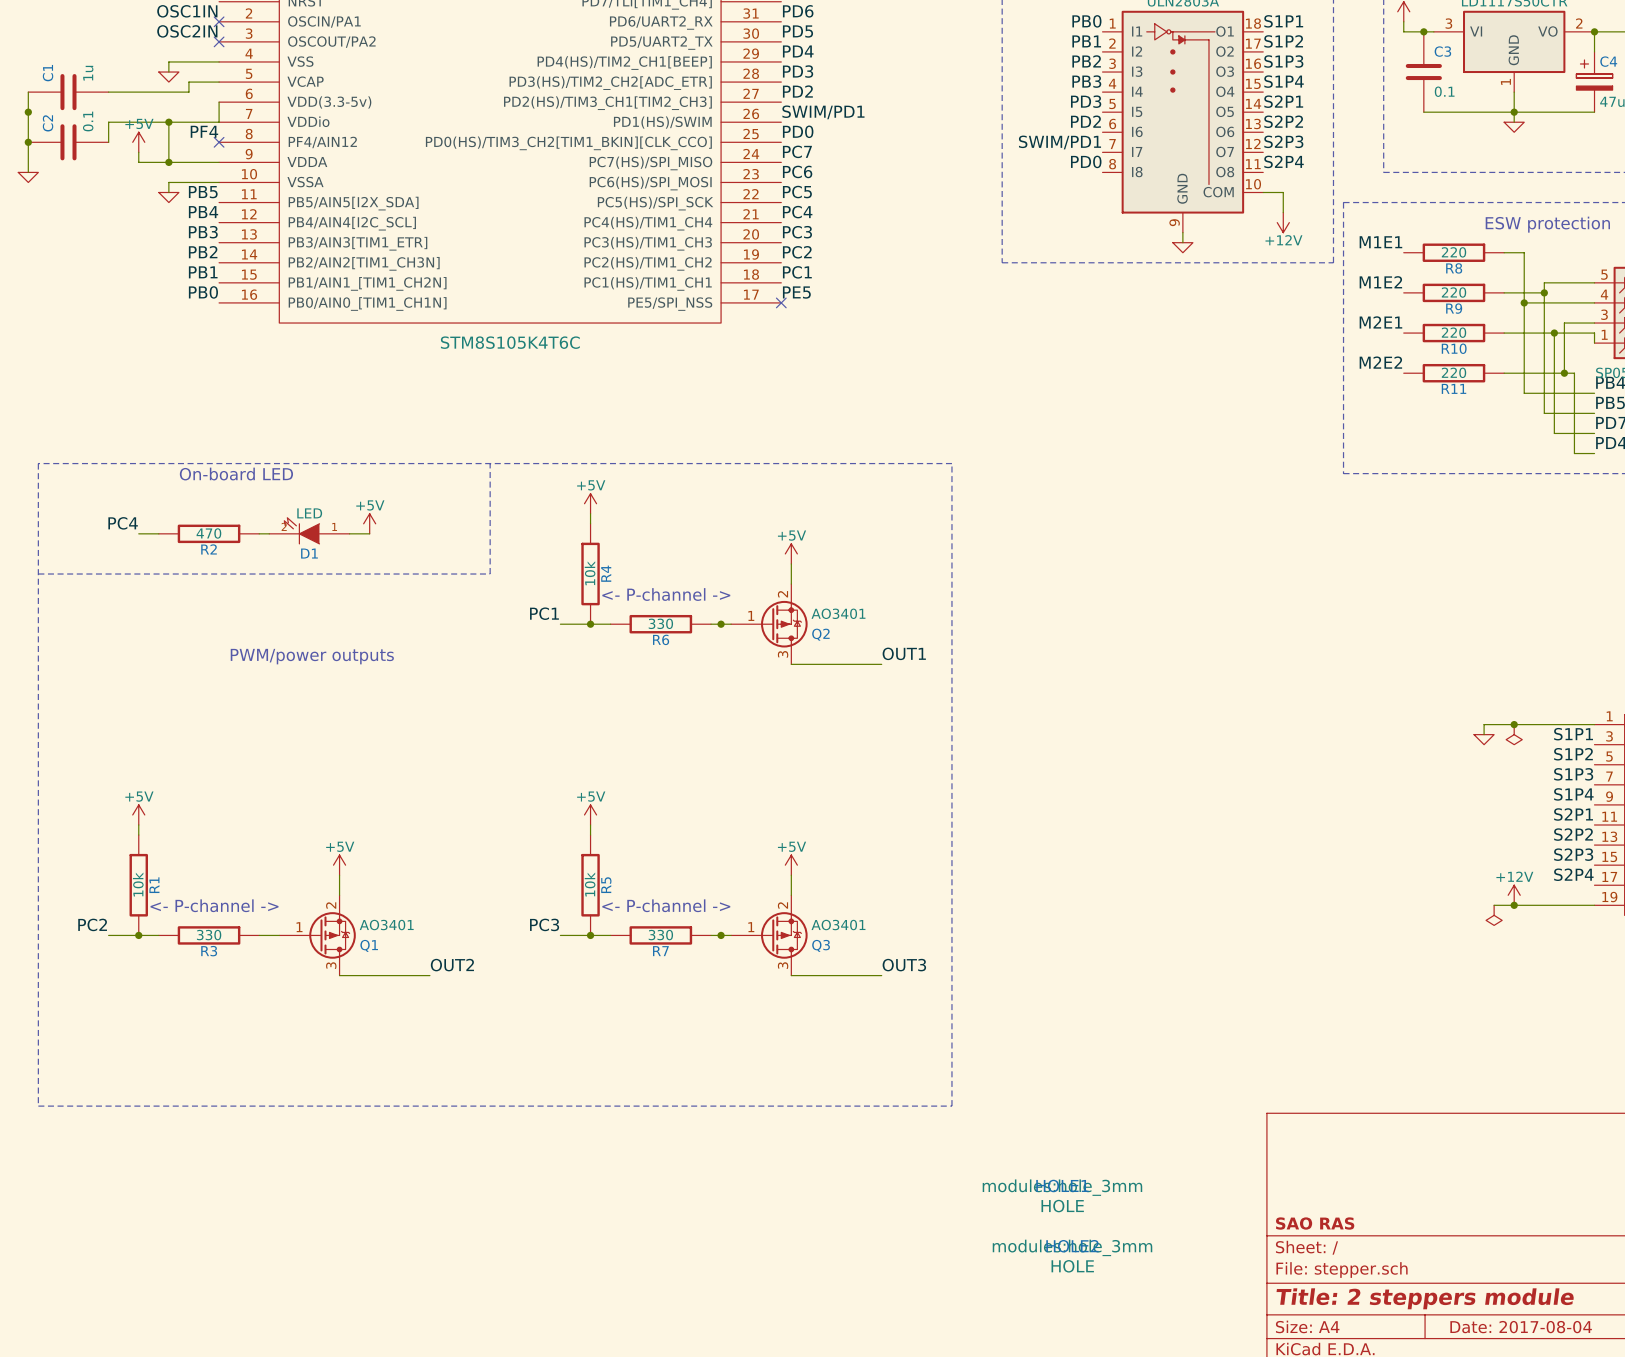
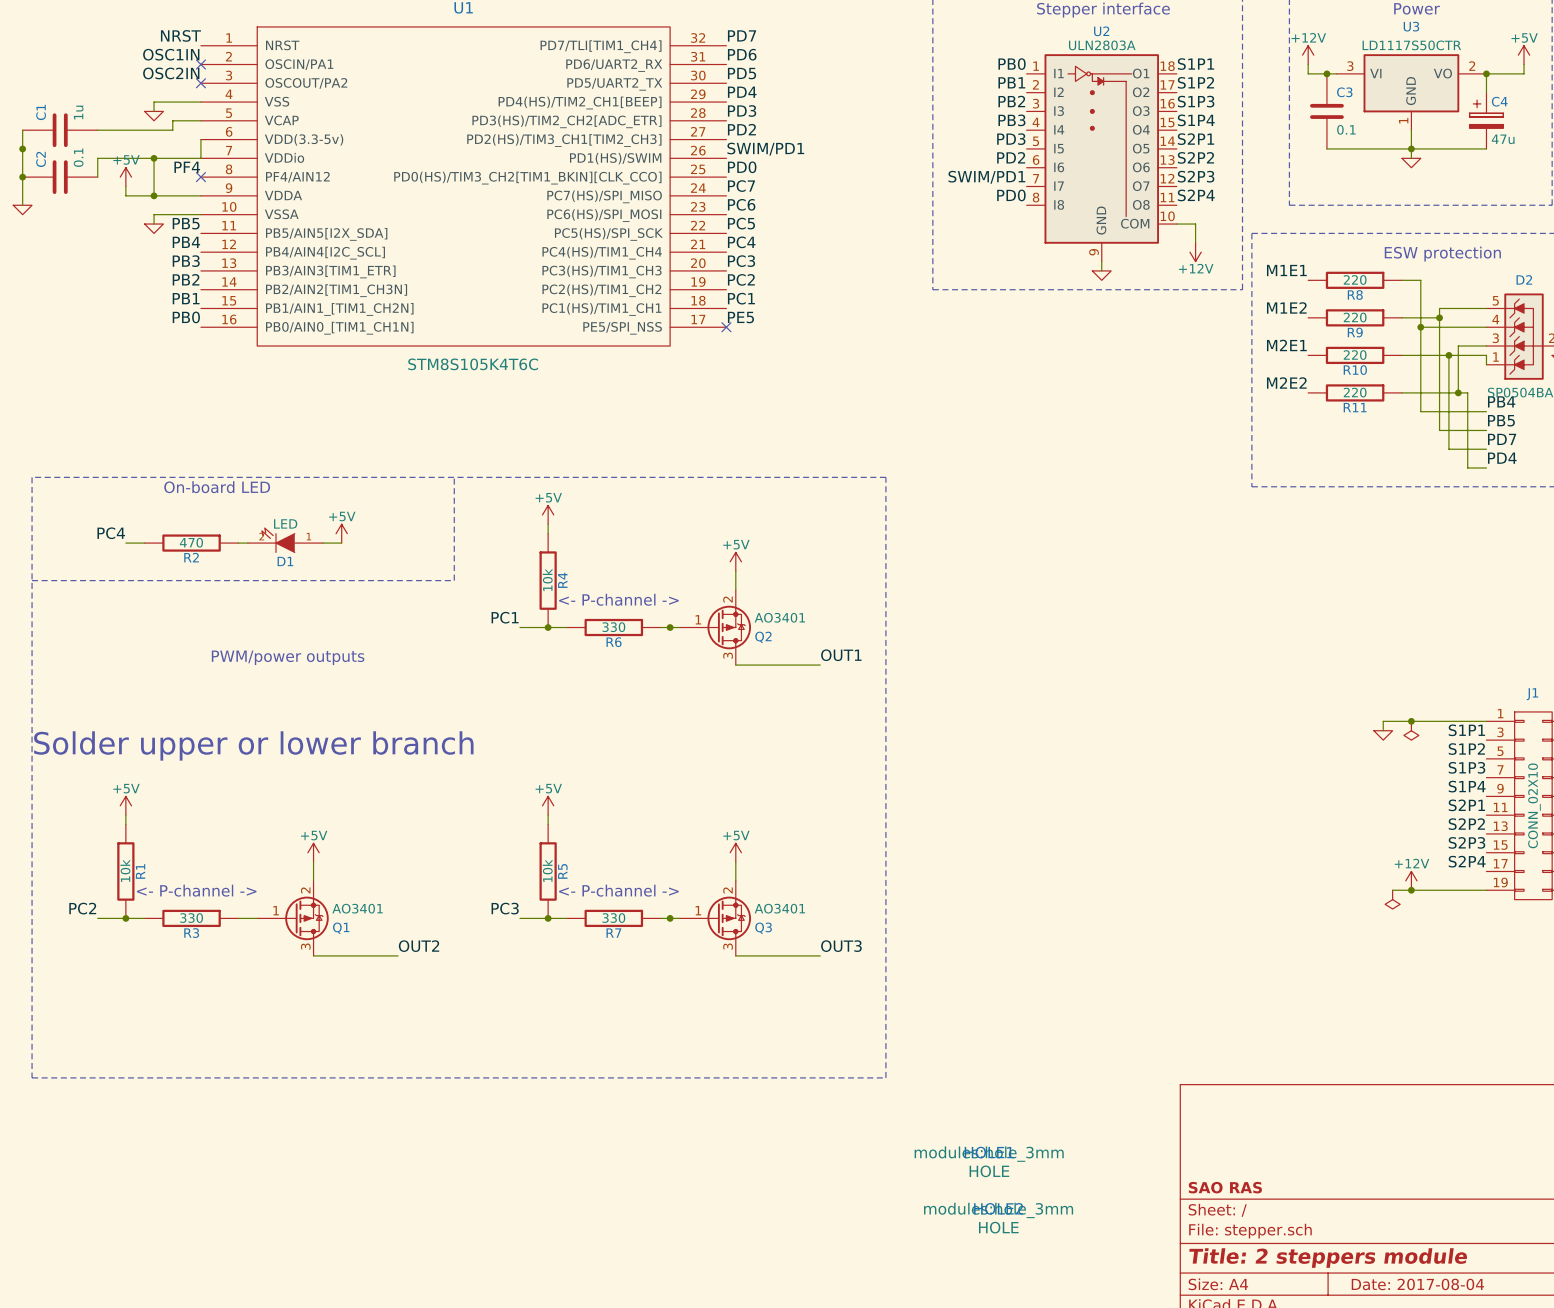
text: none -> Solder upper or lower branch (253, 745)

